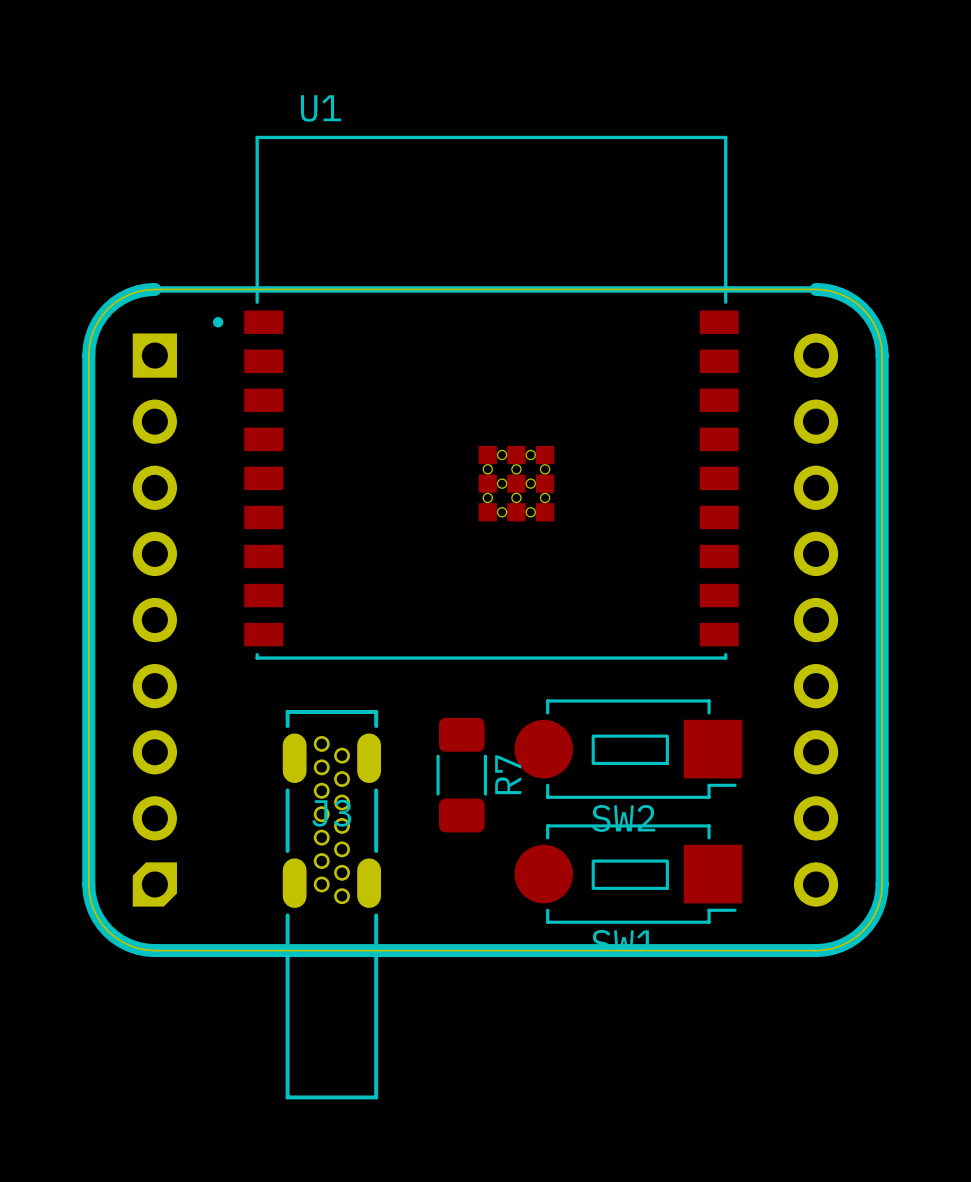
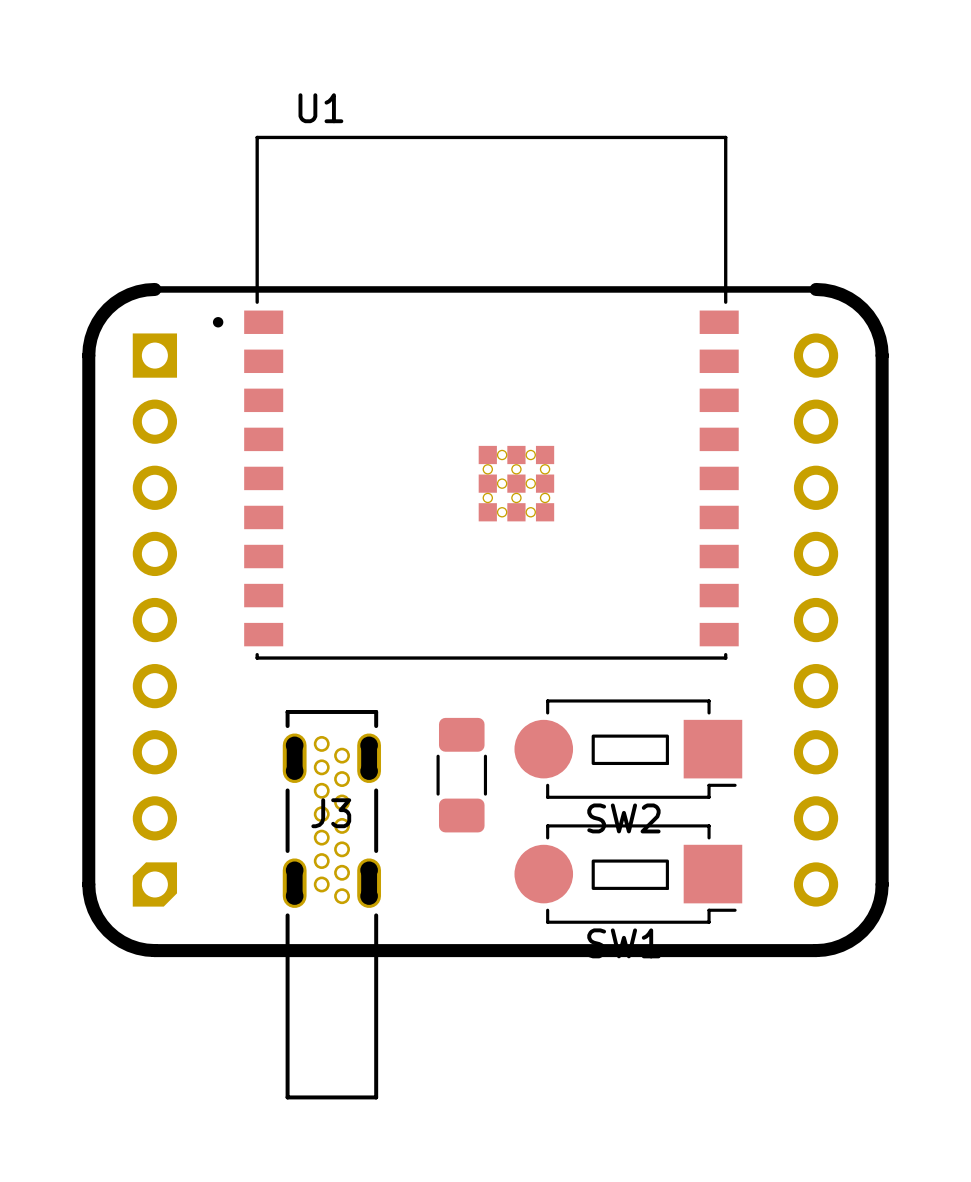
R7 name: R7 (508, 774) -> none

